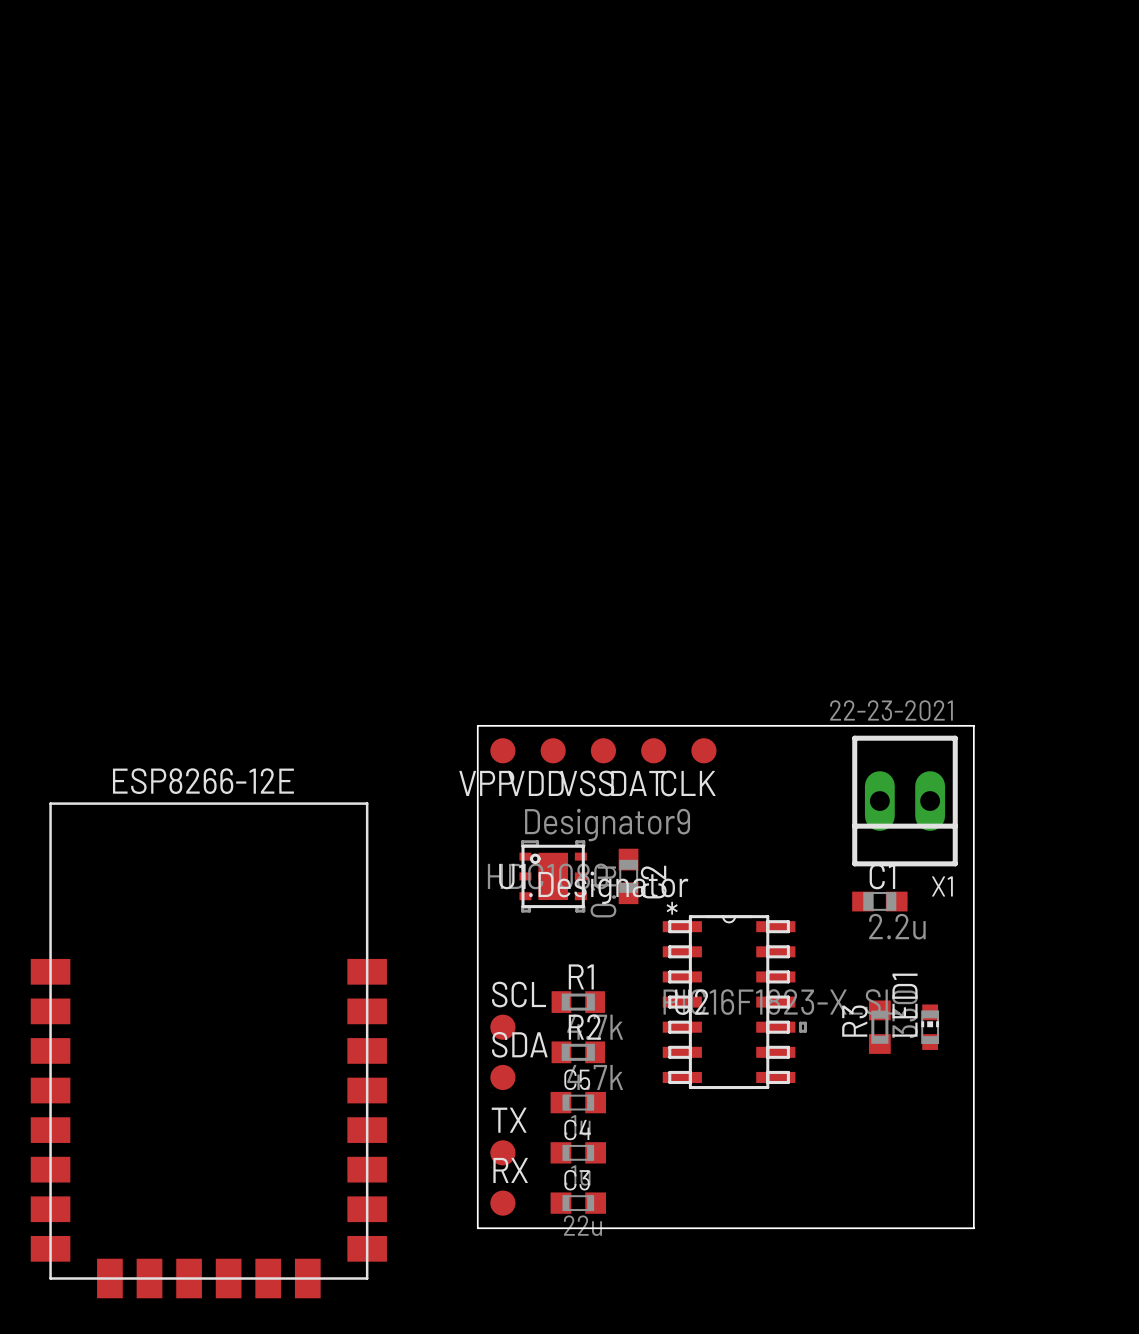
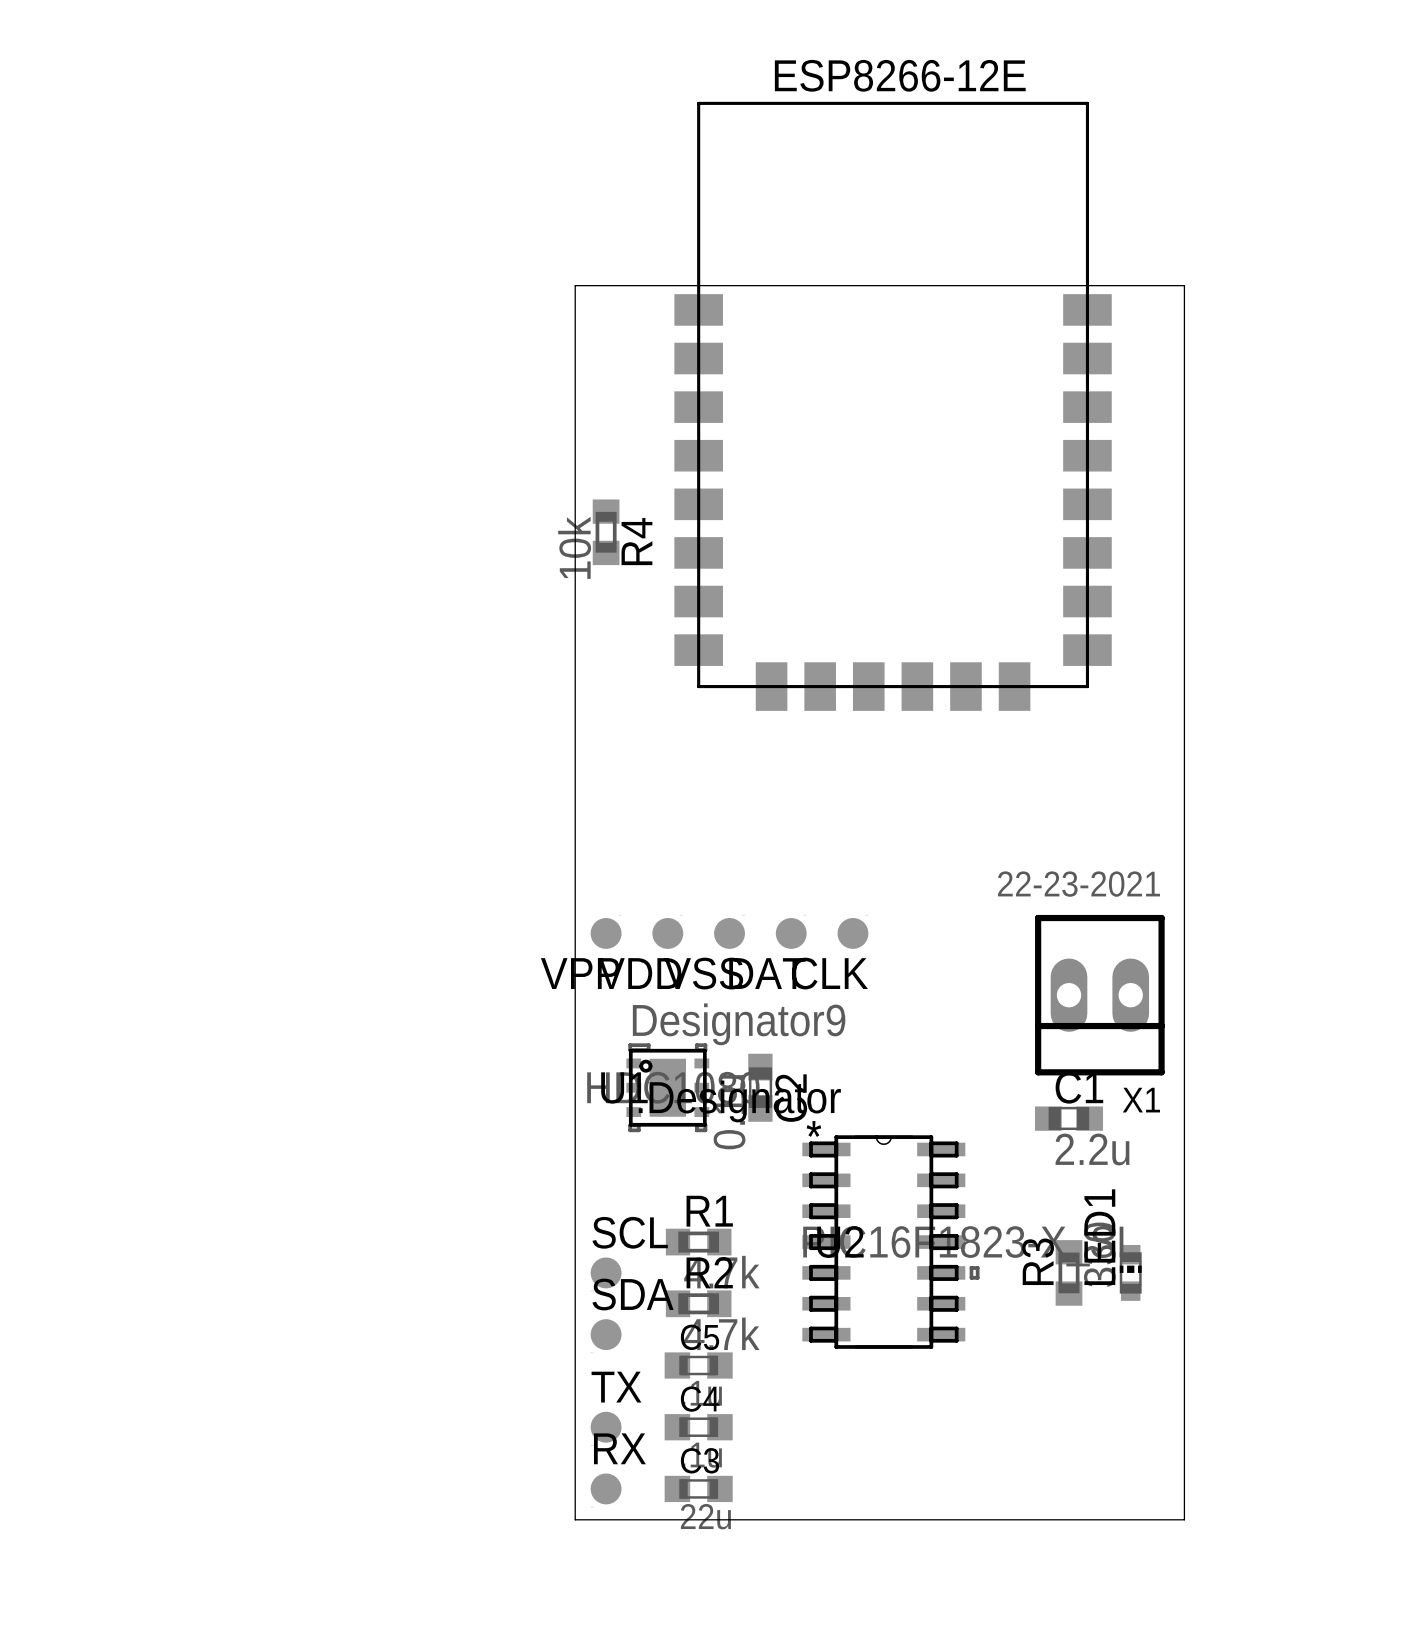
part: none -> (893, 406)
R4: none -> 10k (606, 532)
board edge: (477, 725) (973, 725) -> (575, 902) (575, 285) (1184, 285) (1184, 902)
part: (208, 1050) -> none

